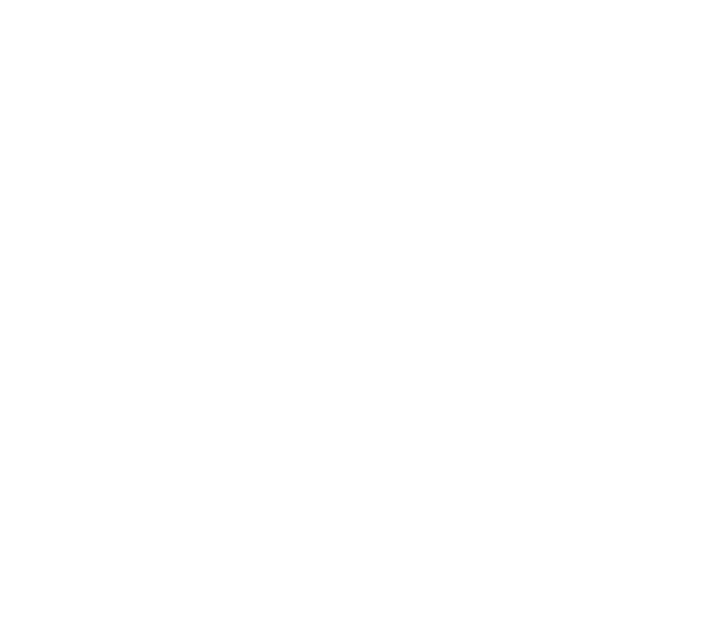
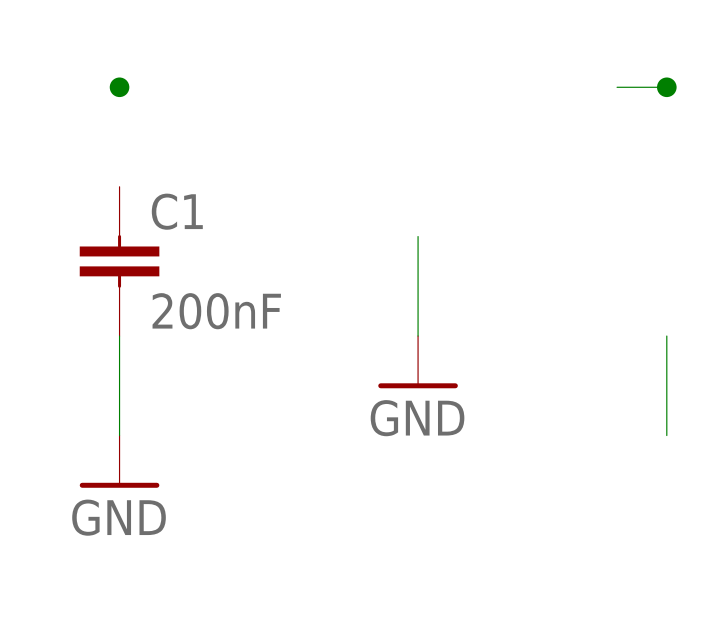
junction: none -> (119, 87)
wire: none -> (617, 87) (666, 87)
junction: none -> (666, 87)
wire: none -> (418, 236) (418, 336)
C1: none -> 200nF (119, 261)
wire: none -> (119, 336) (119, 435)
wire: none -> (666, 336) (666, 435)
power symbol: none -> GND (418, 362)
power symbol: none -> GND (119, 461)

